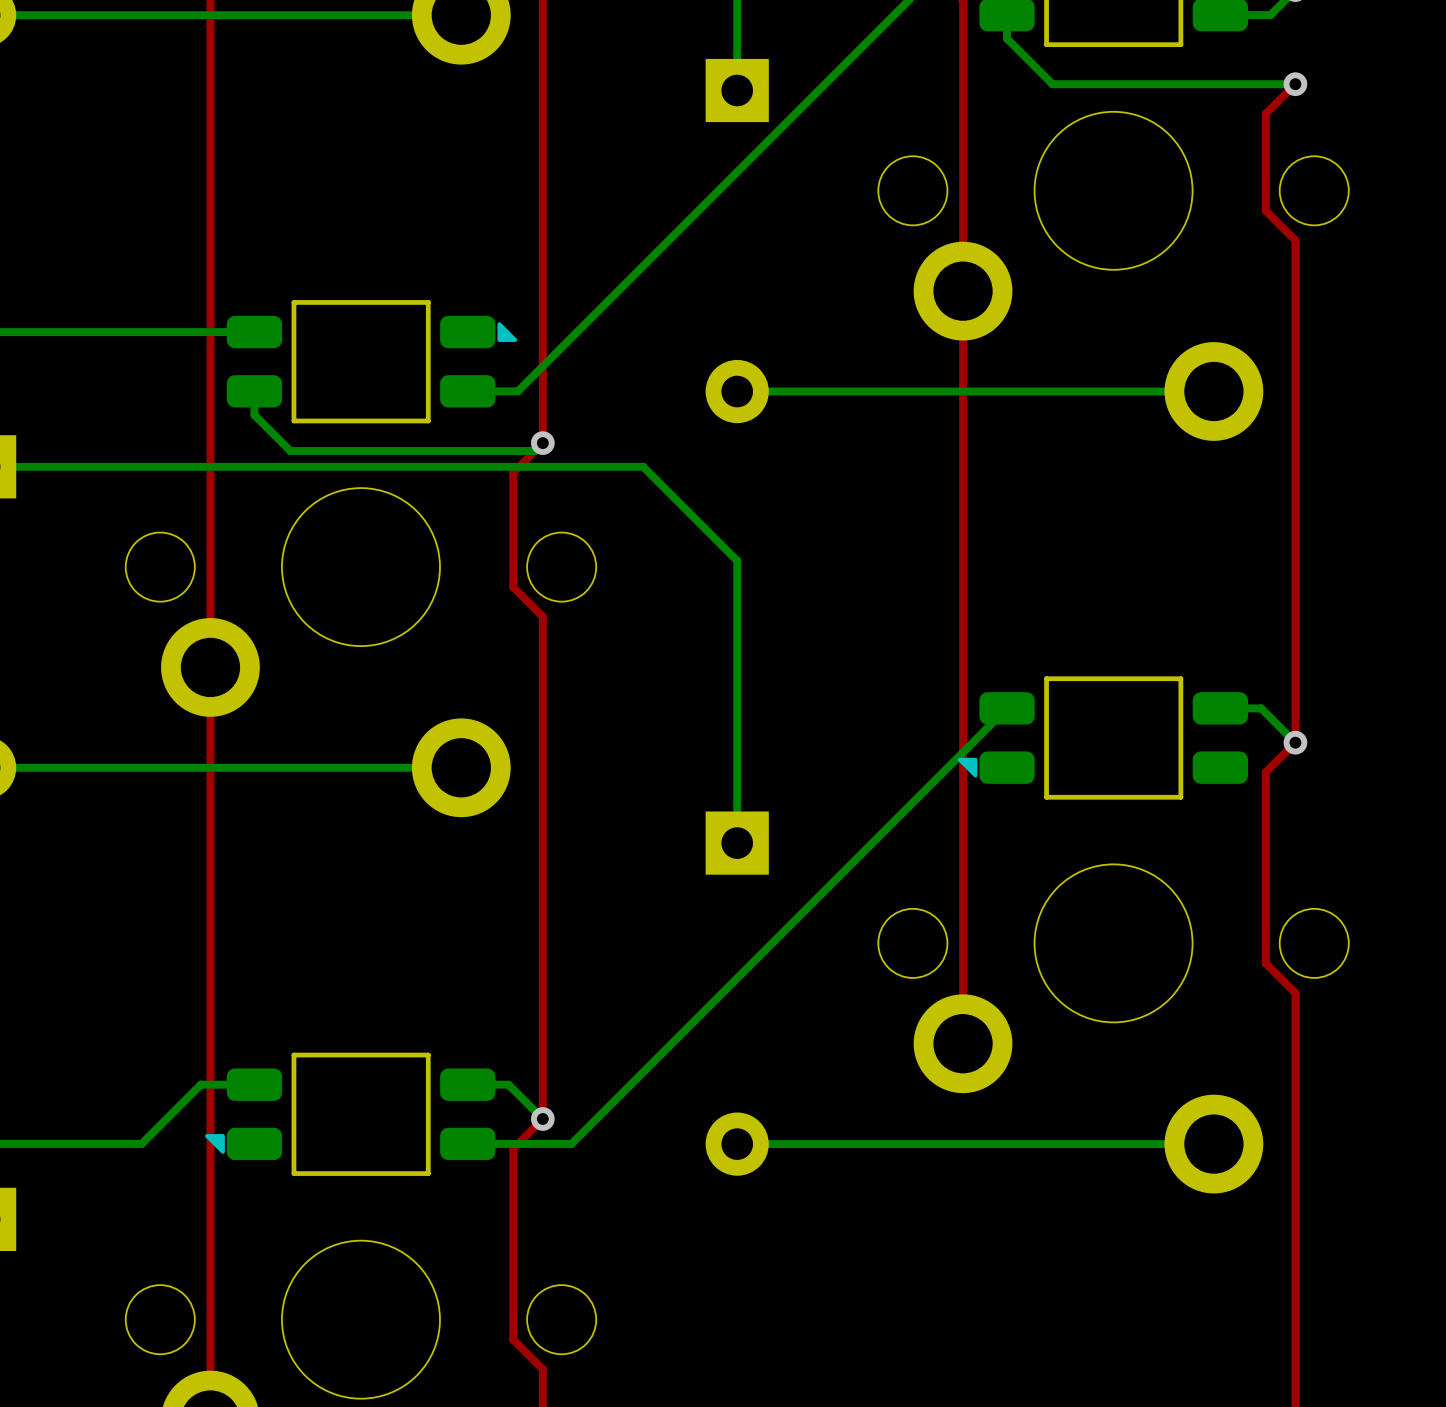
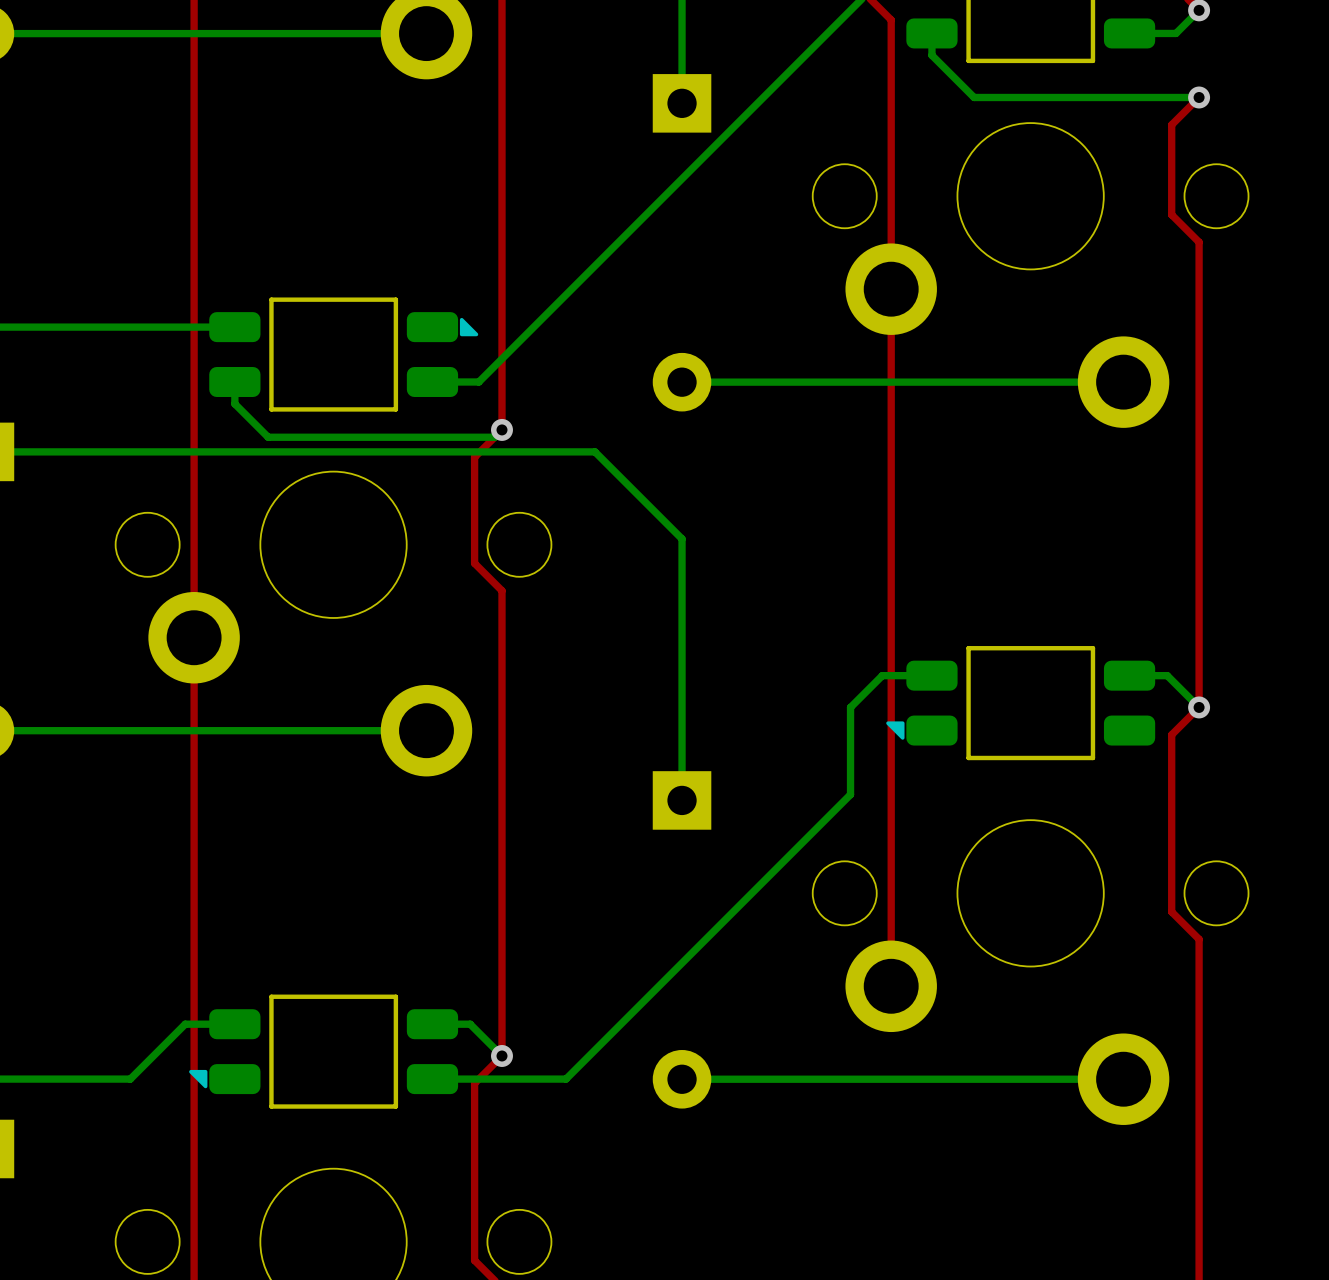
bottom track: (1007, 708) (571, 1143) -> (931, 675) (882, 675) (850, 707) (850, 794) (566, 1079) (528, 1079)

